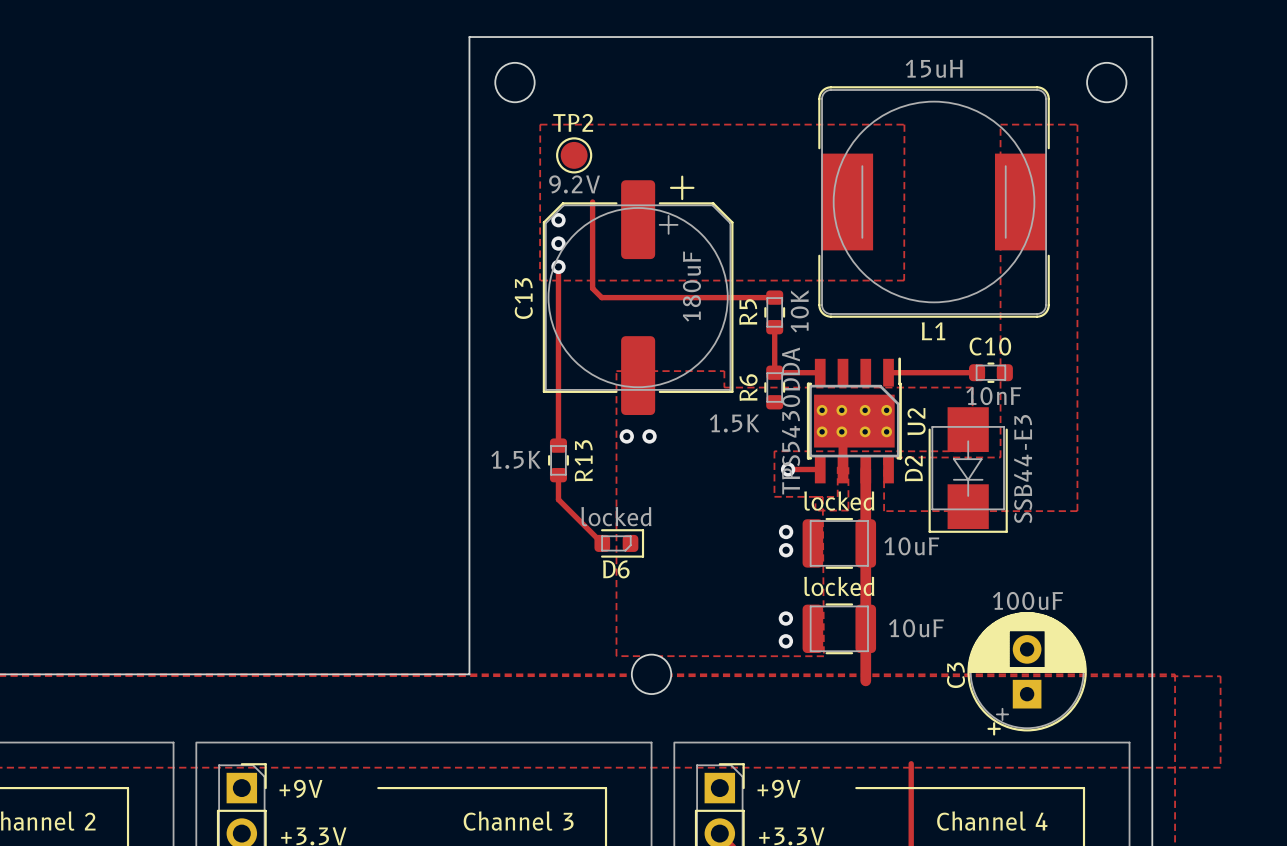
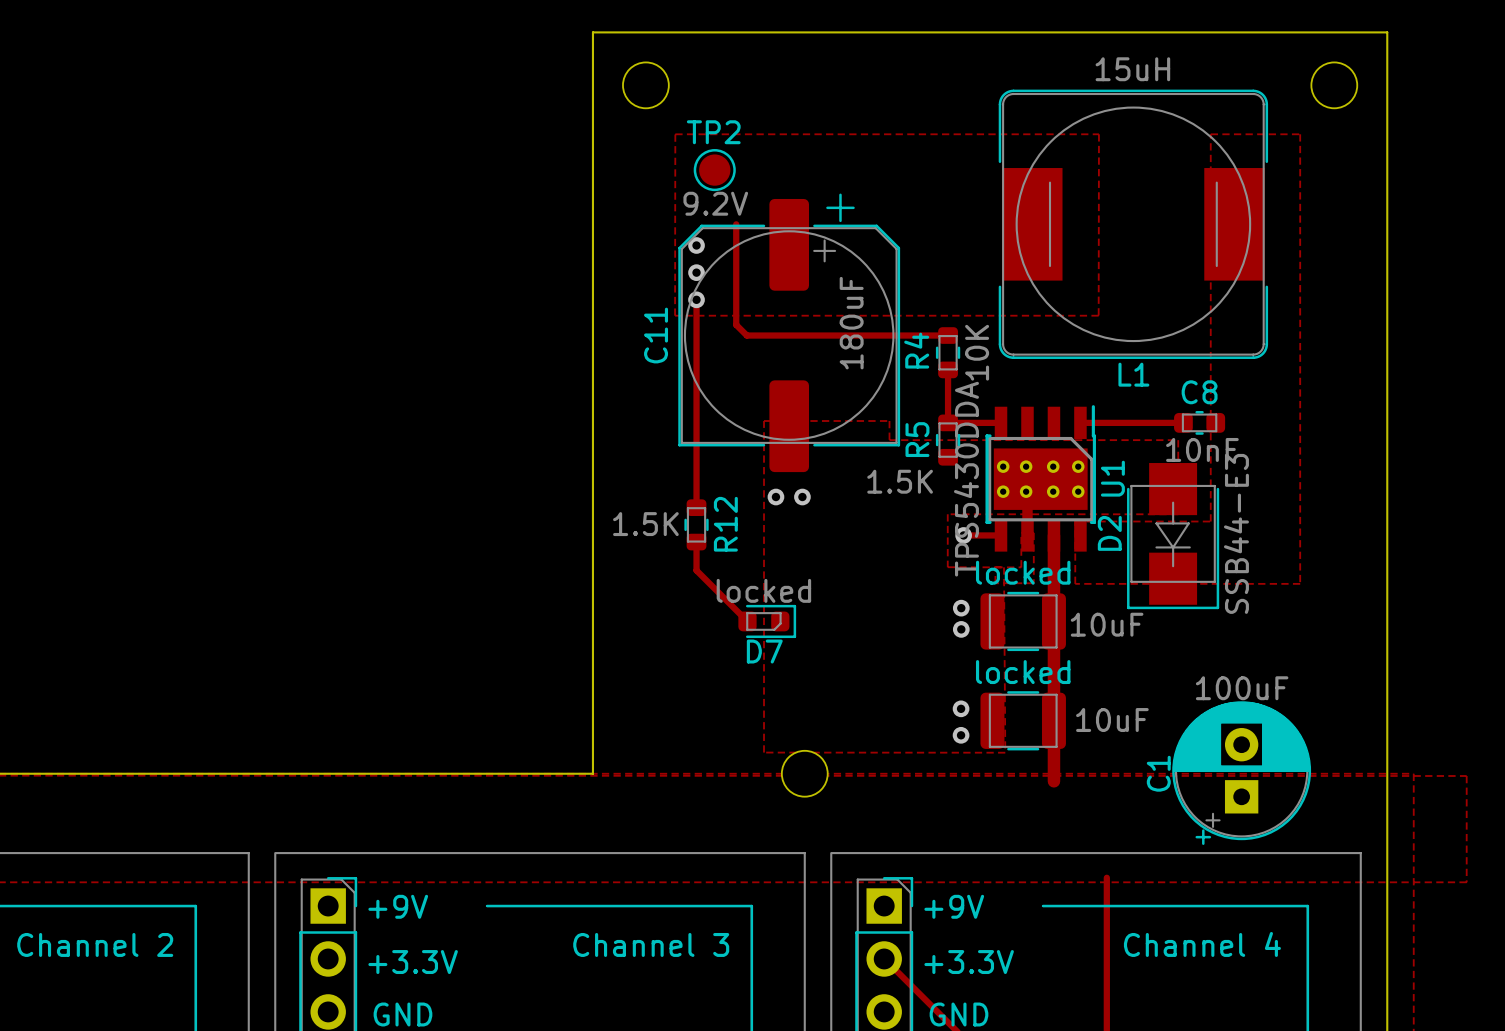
C13 name: C13 (523, 298) -> C11 (656, 335)
R5 name: R5 (748, 312) -> R4 (916, 350)
C10 name: C10 (990, 346) -> C8 (1199, 392)
R6 name: R6 (748, 387) -> R5 (917, 439)
U2 name: U2 (916, 421) -> U1 (1112, 478)
R13 name: R13 (583, 460) -> R12 (725, 524)
D6 name: D6 (616, 569) -> D7 (764, 651)
C3 name: C3 (955, 675) -> C1 (1158, 773)

